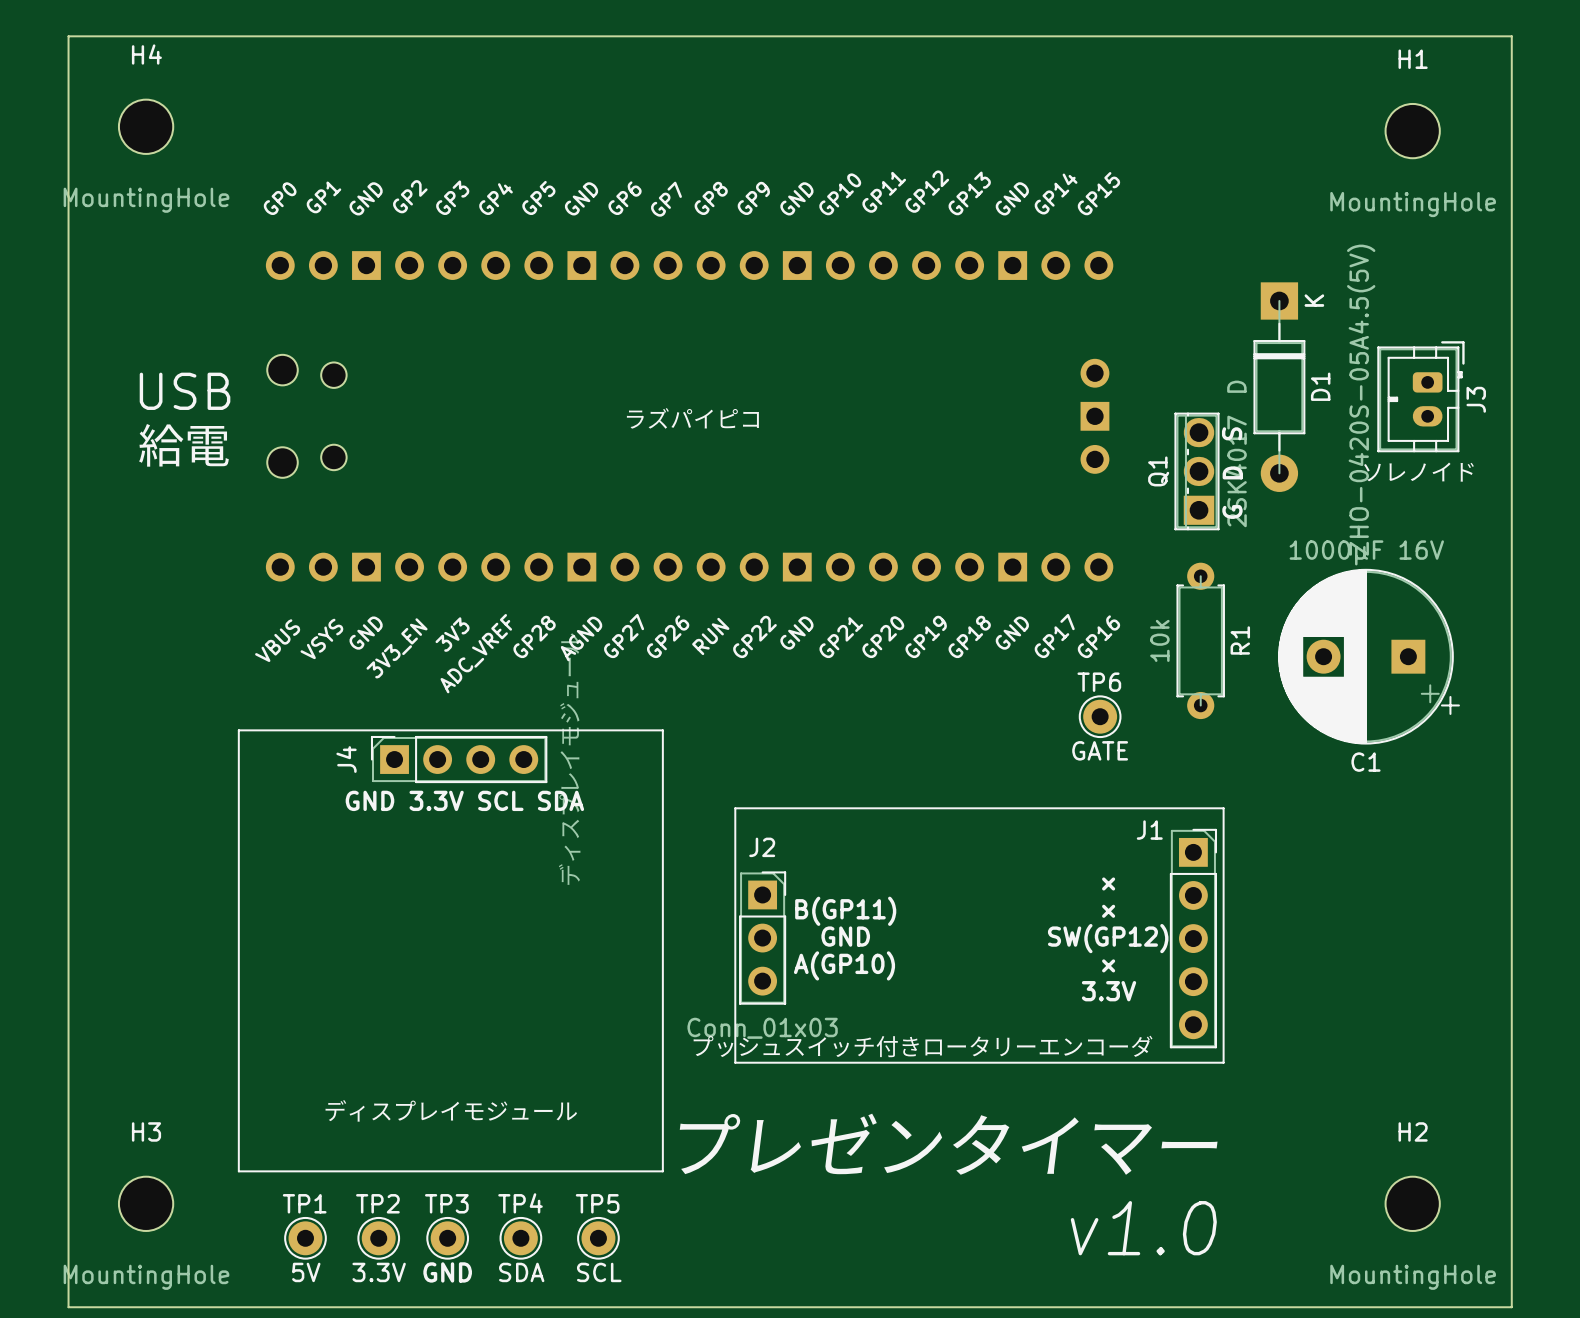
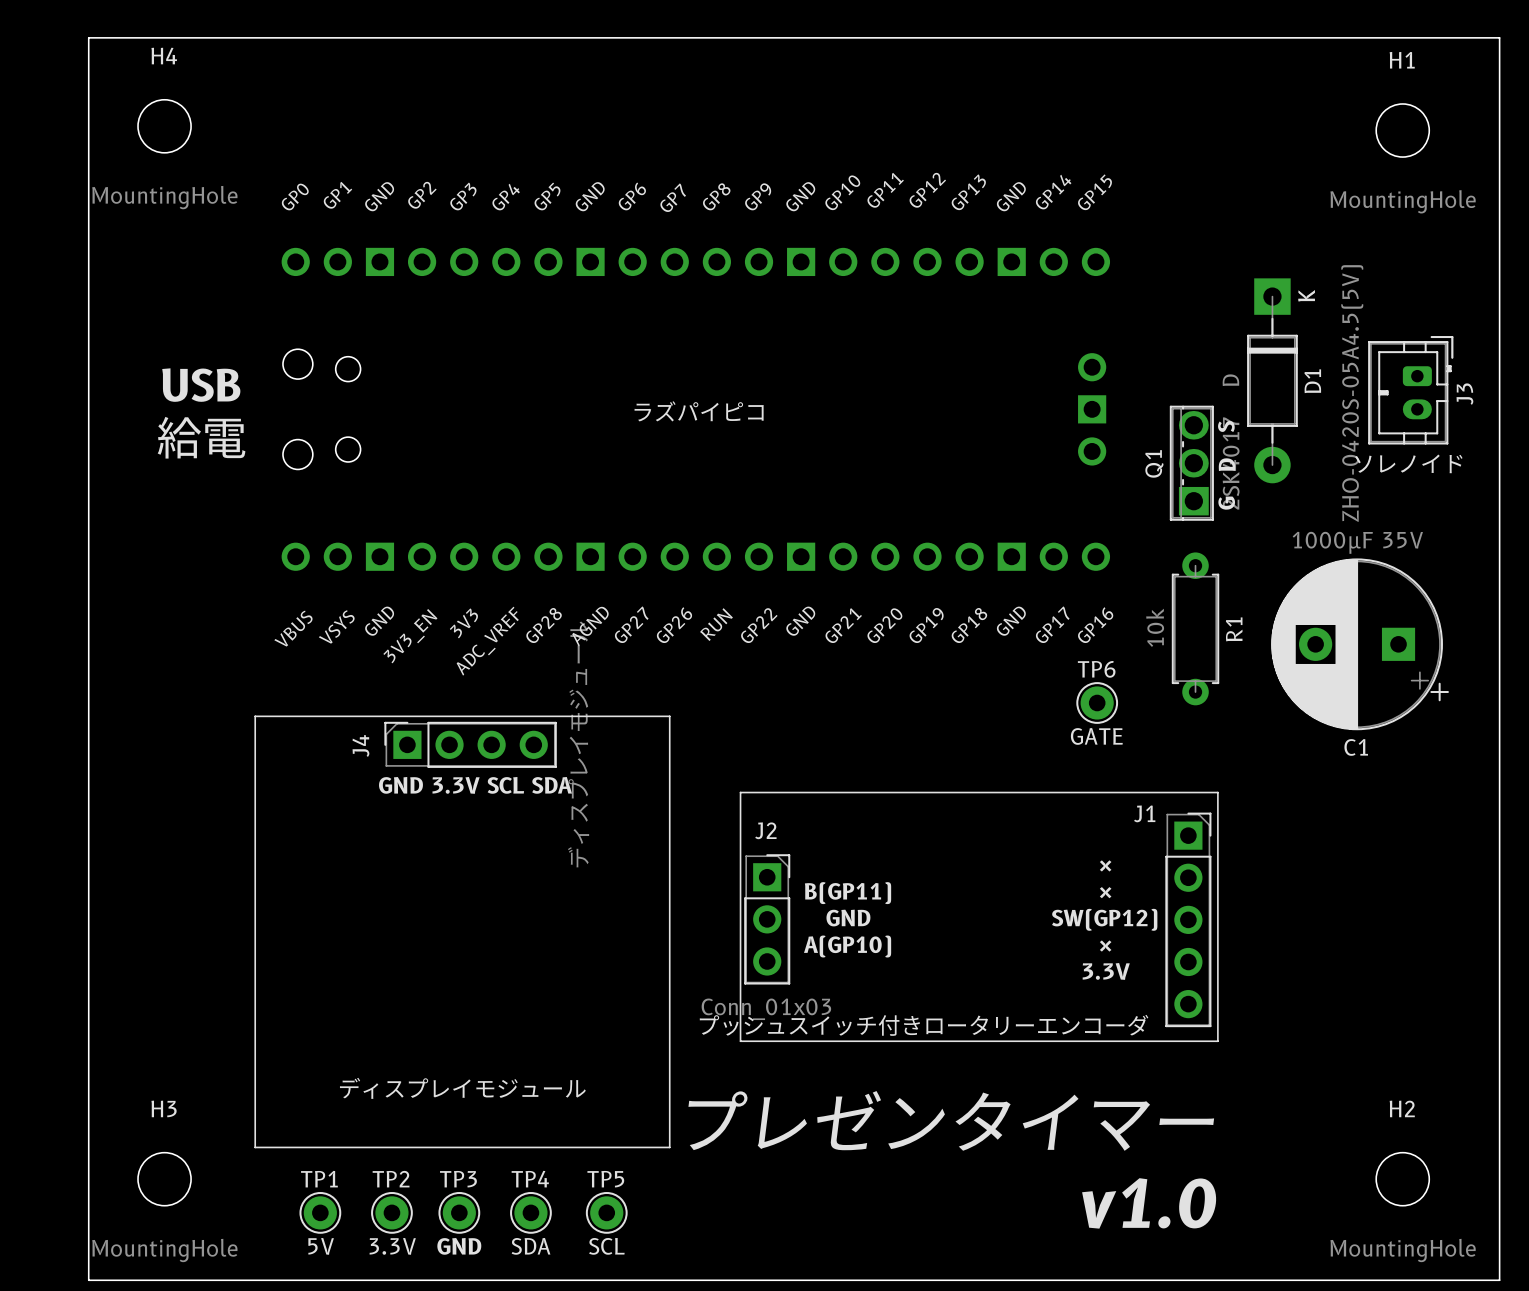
C1 value: 1000µF 16V (1366, 552) -> 1000µF 35V (1357, 542)

